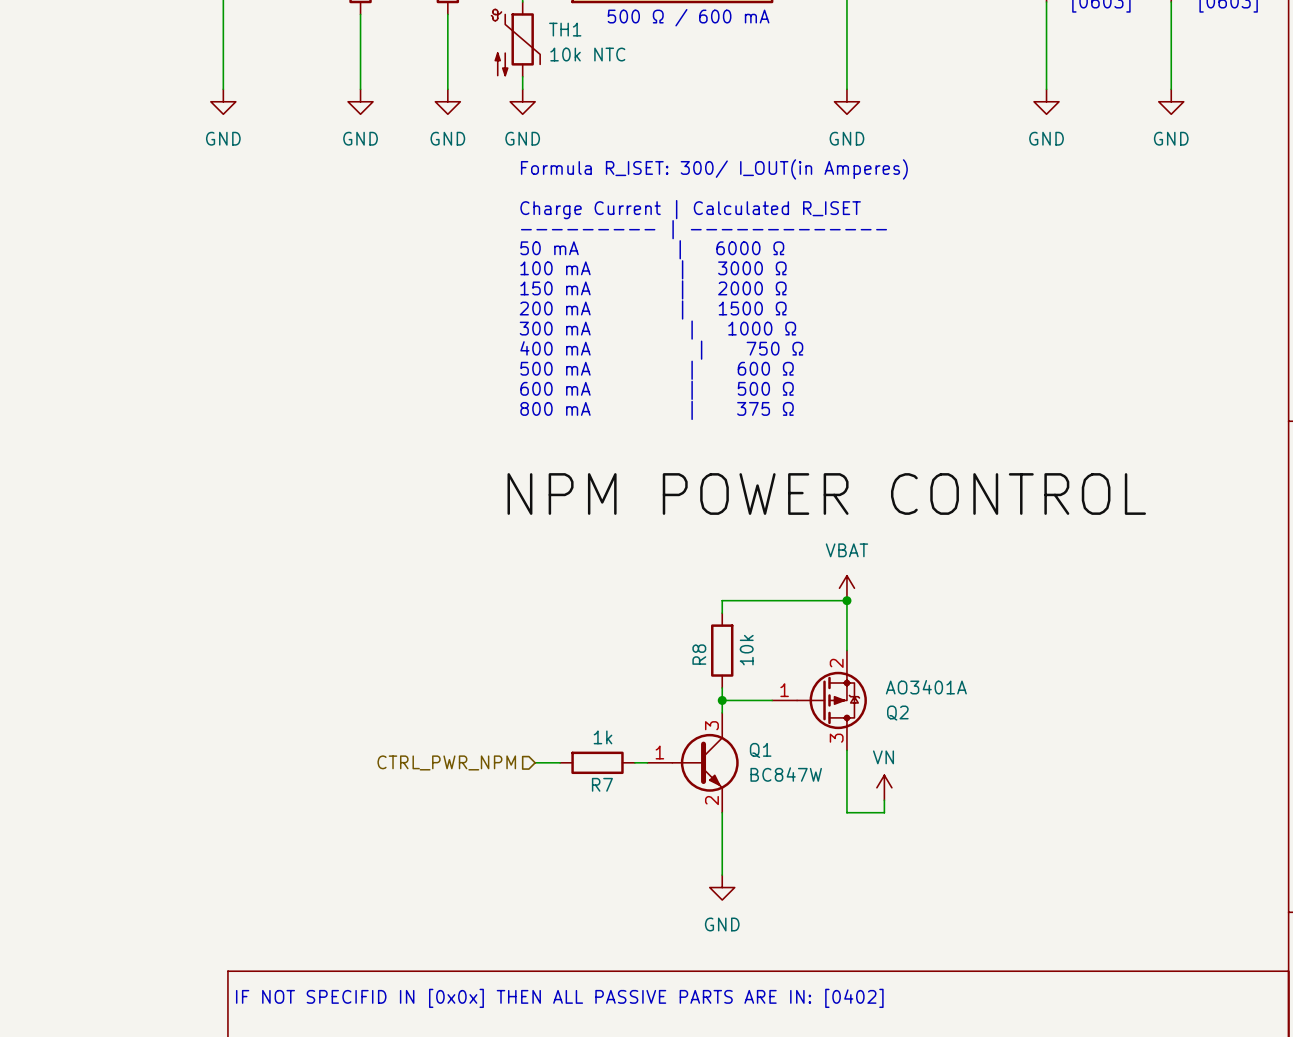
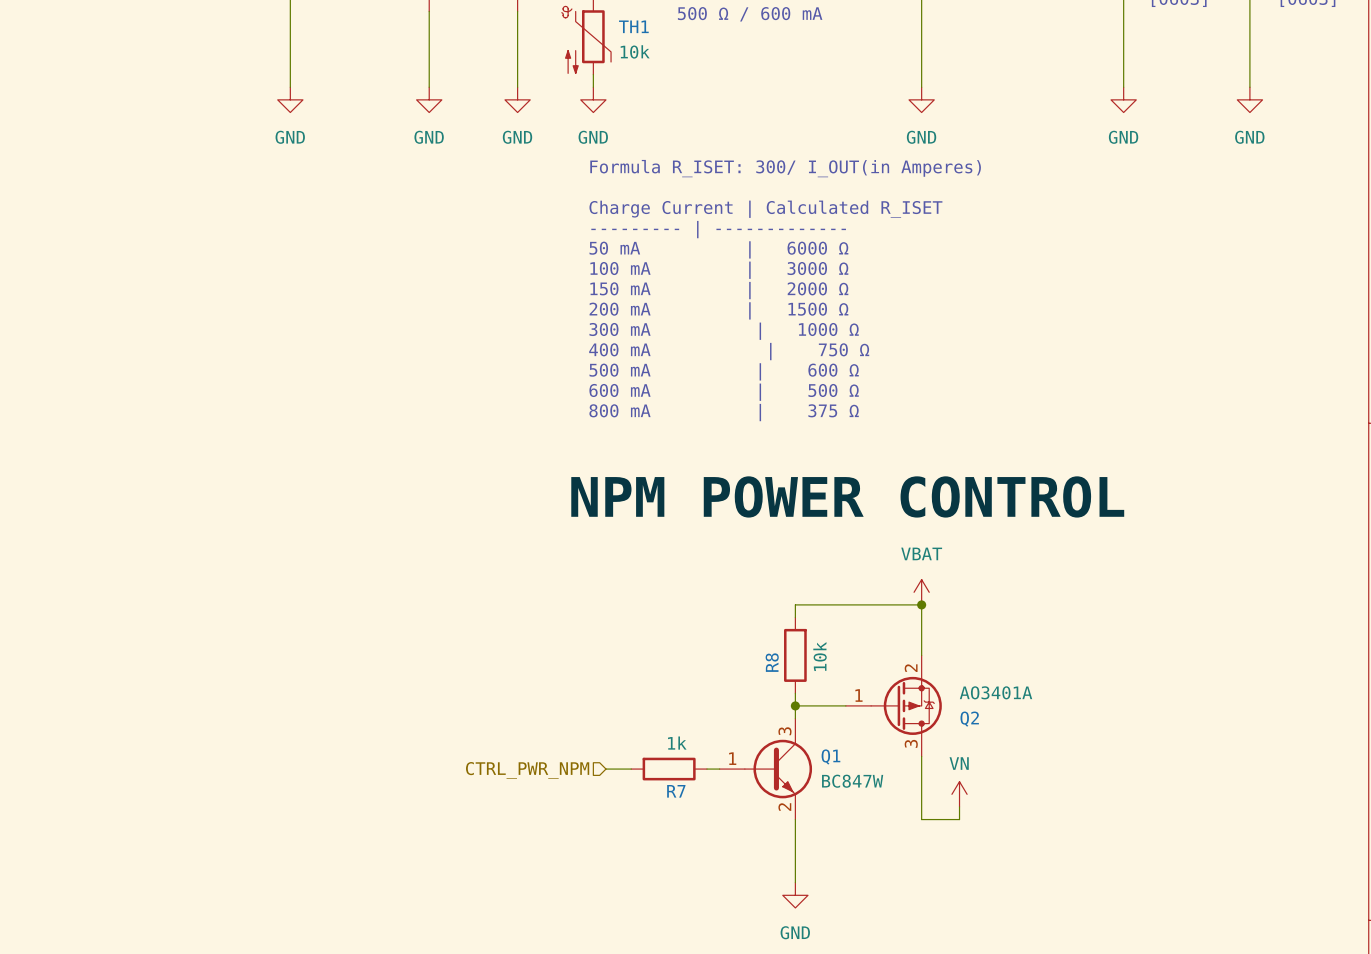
TH1 value: 10k NTC (587, 54) -> 10k (635, 51)

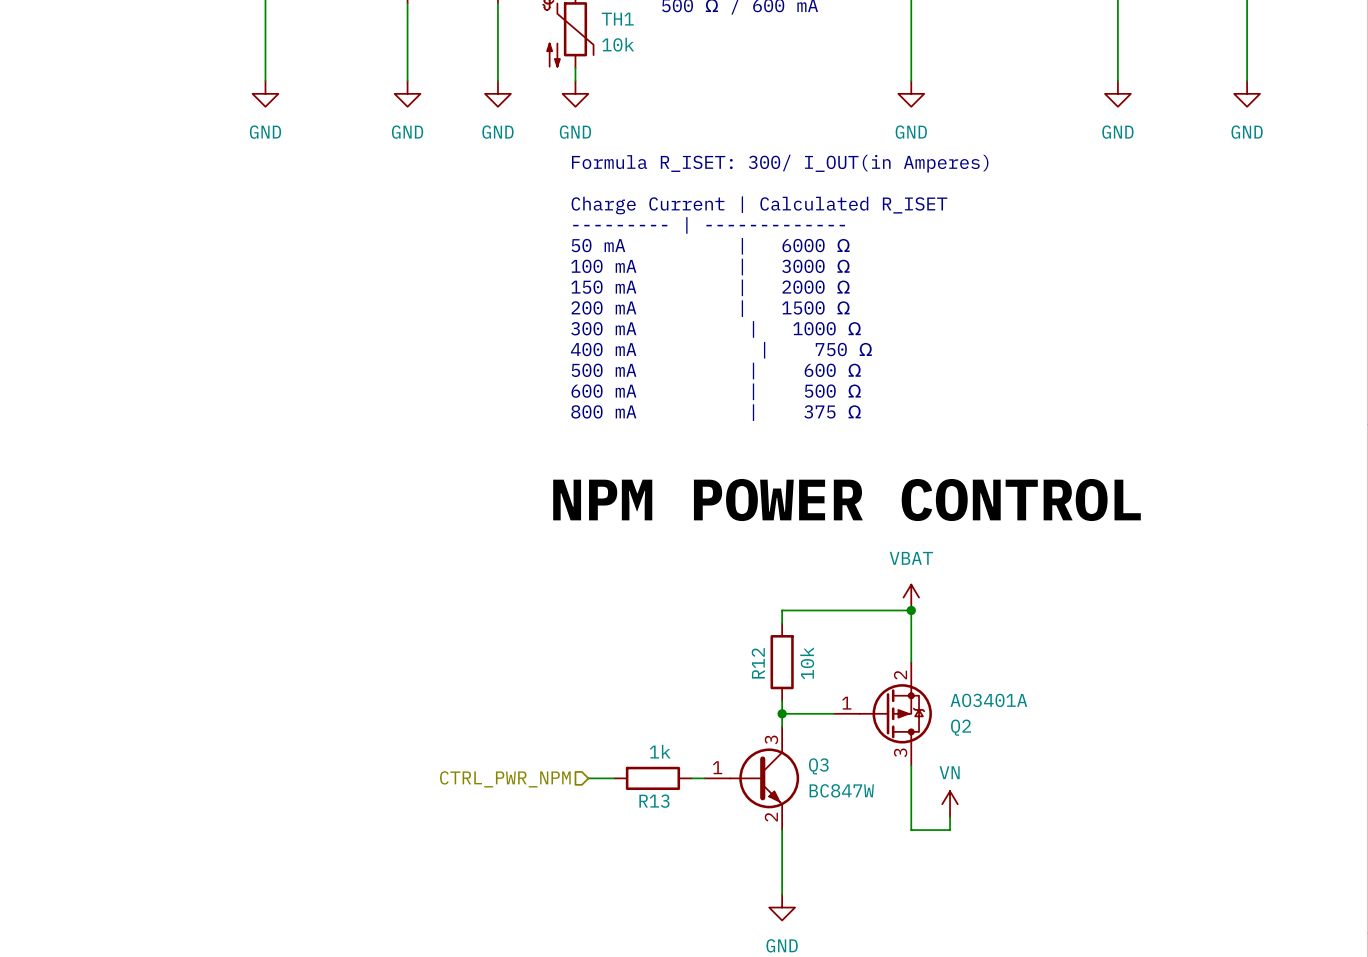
R8 name: R8 (772, 662) -> R12 (758, 663)
Q1 name: Q1 (830, 756) -> Q3 (818, 766)
R7 name: R7 (676, 791) -> R13 (654, 801)

